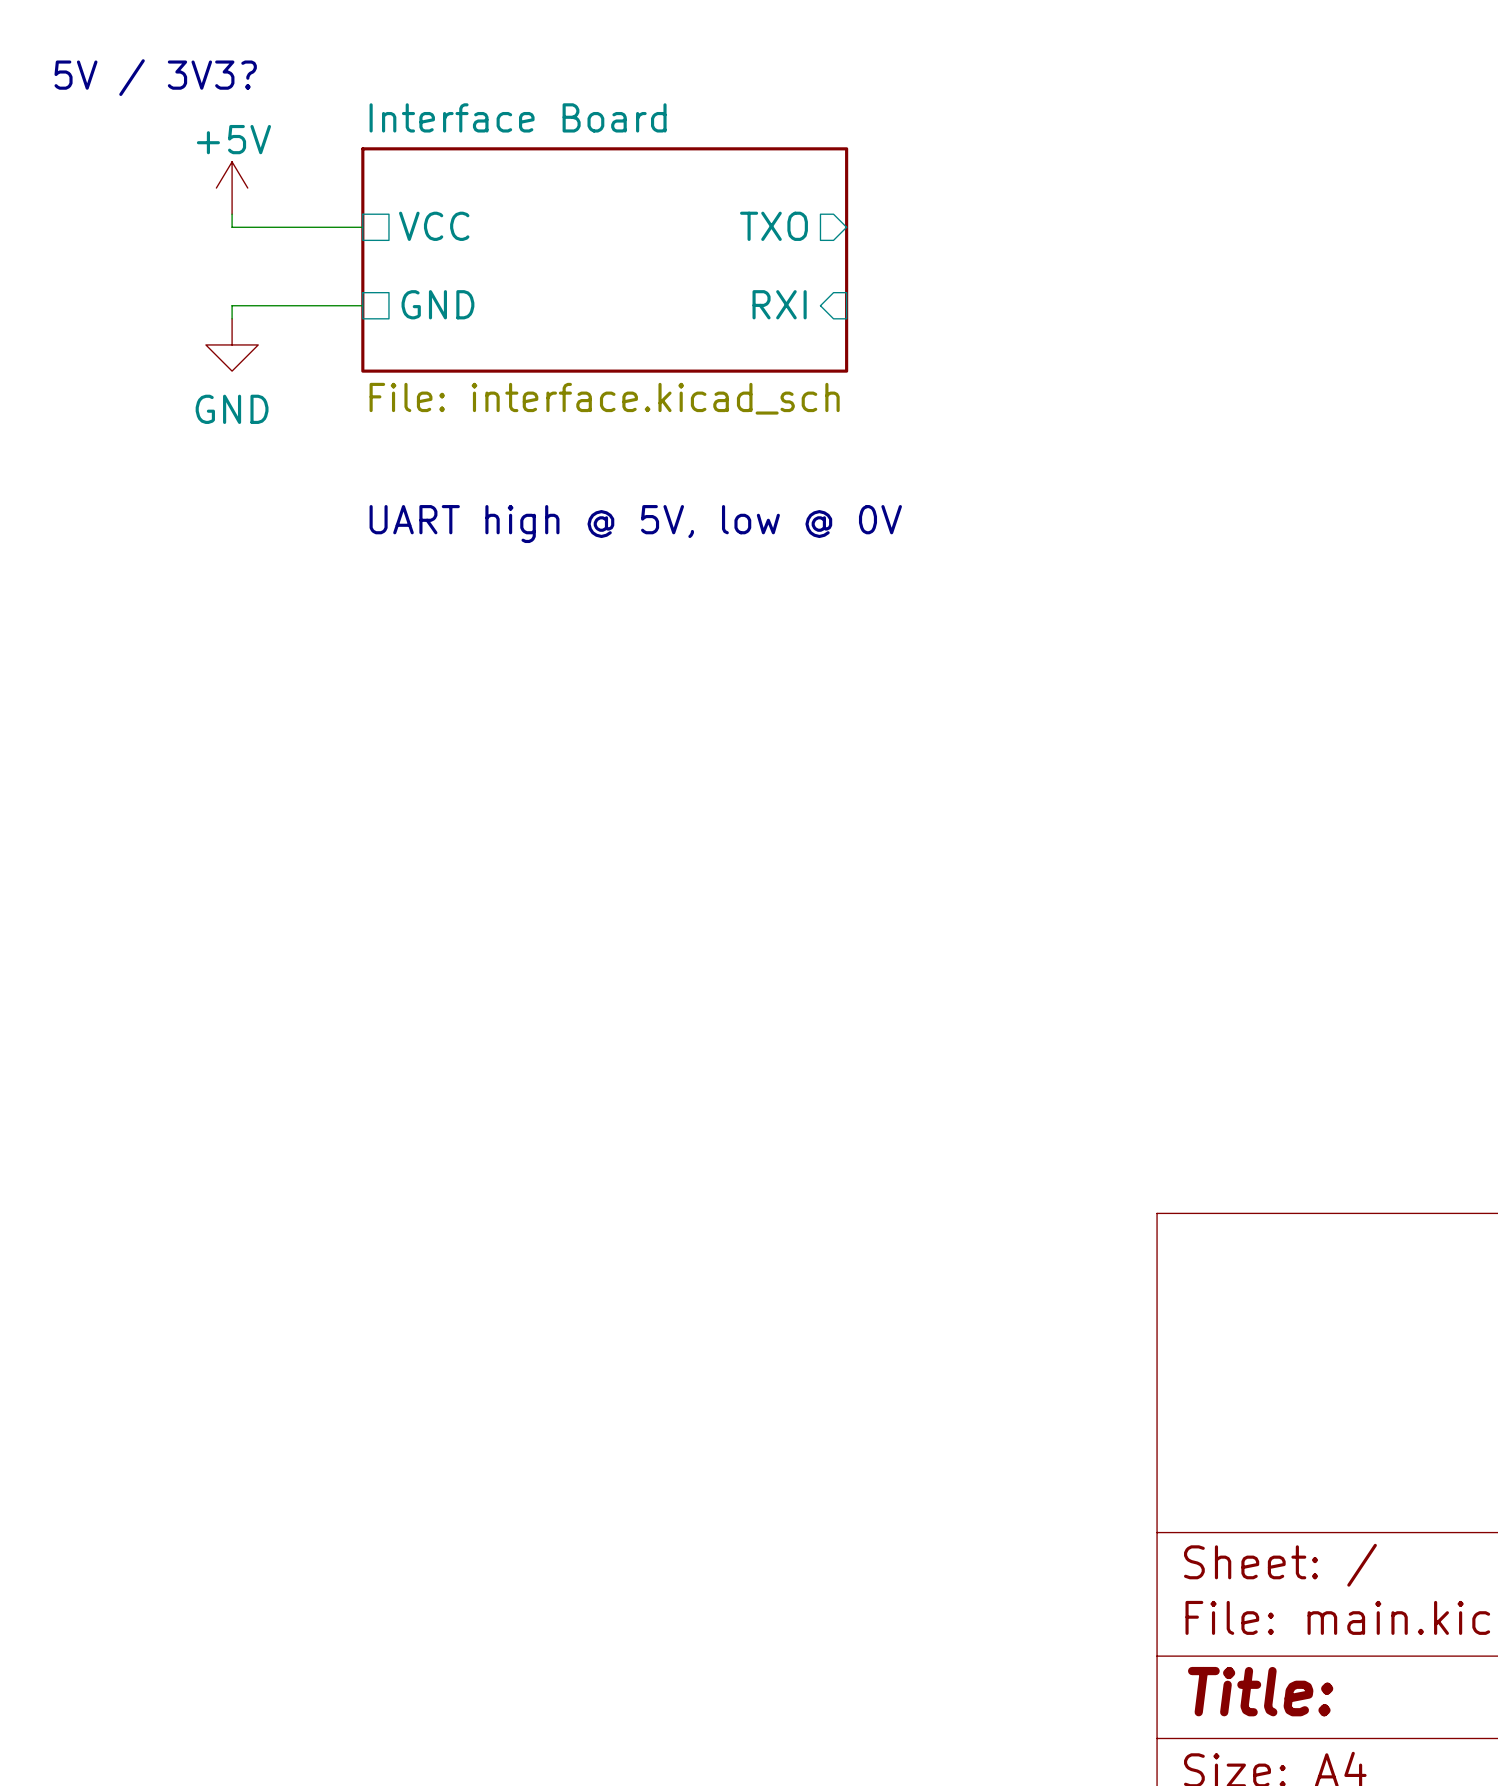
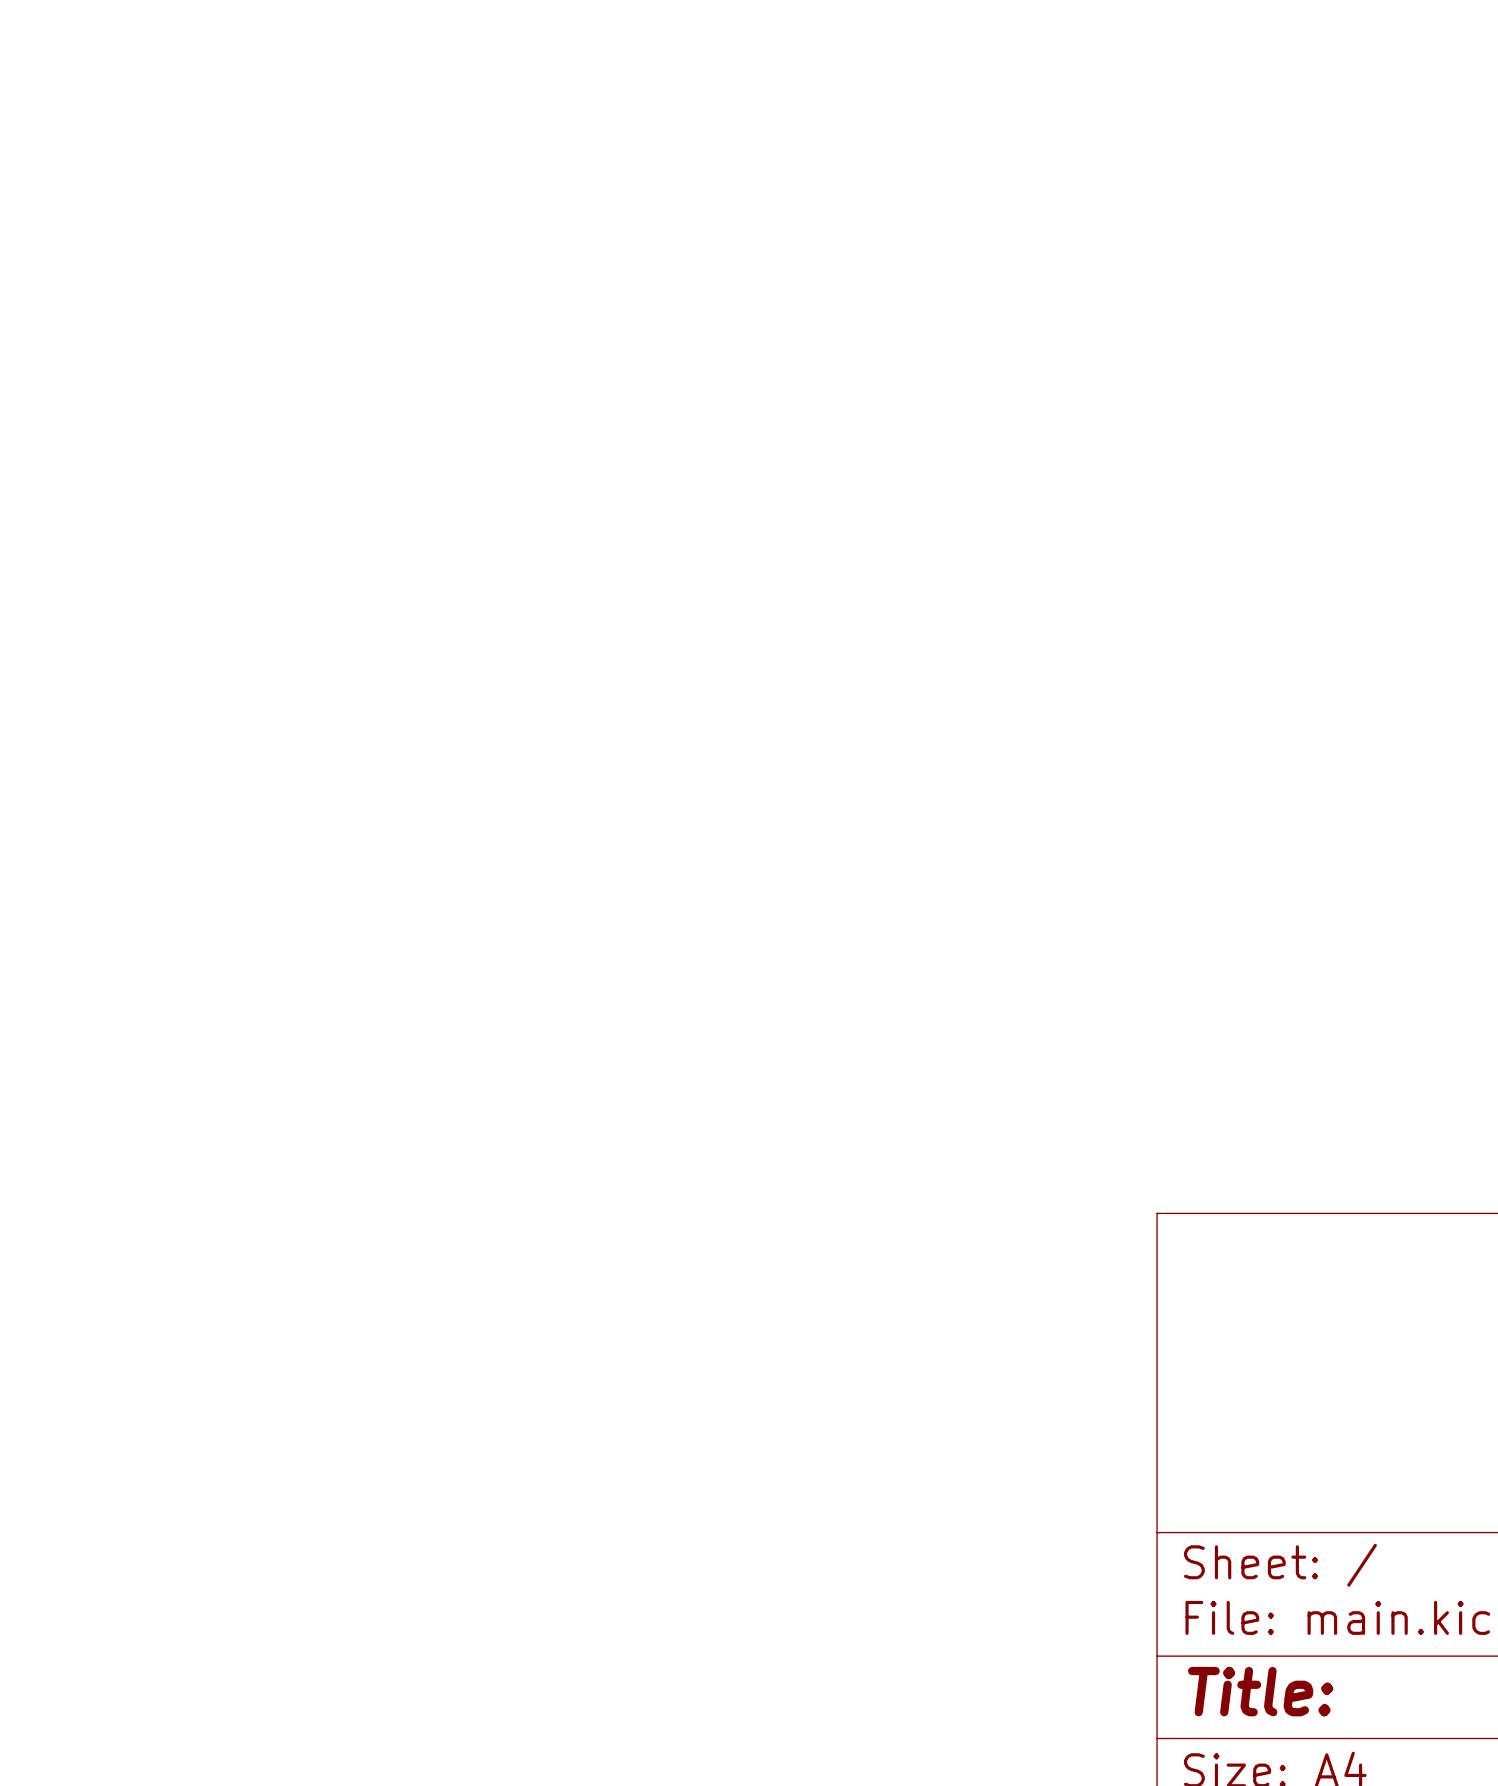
text: 5V / 3V3? (155, 77) -> none
power symbol: +5V (232, 188) -> none
wire: (232, 214) (232, 227) (362, 227) -> none
sheet pin: VCC (434, 226) -> none
sheet pin: TXO (773, 226) -> none
sheet Interface Board: File: interface.kicad_sch (604, 259) -> none
sheet pin: GND (437, 304) -> none
sheet pin: RXI (779, 304) -> none
wire: (362, 305) (232, 305) (232, 318) -> none
power symbol: GND (232, 344) -> none
text: UART high @ 5V, low @ 0V (635, 524) -> none

